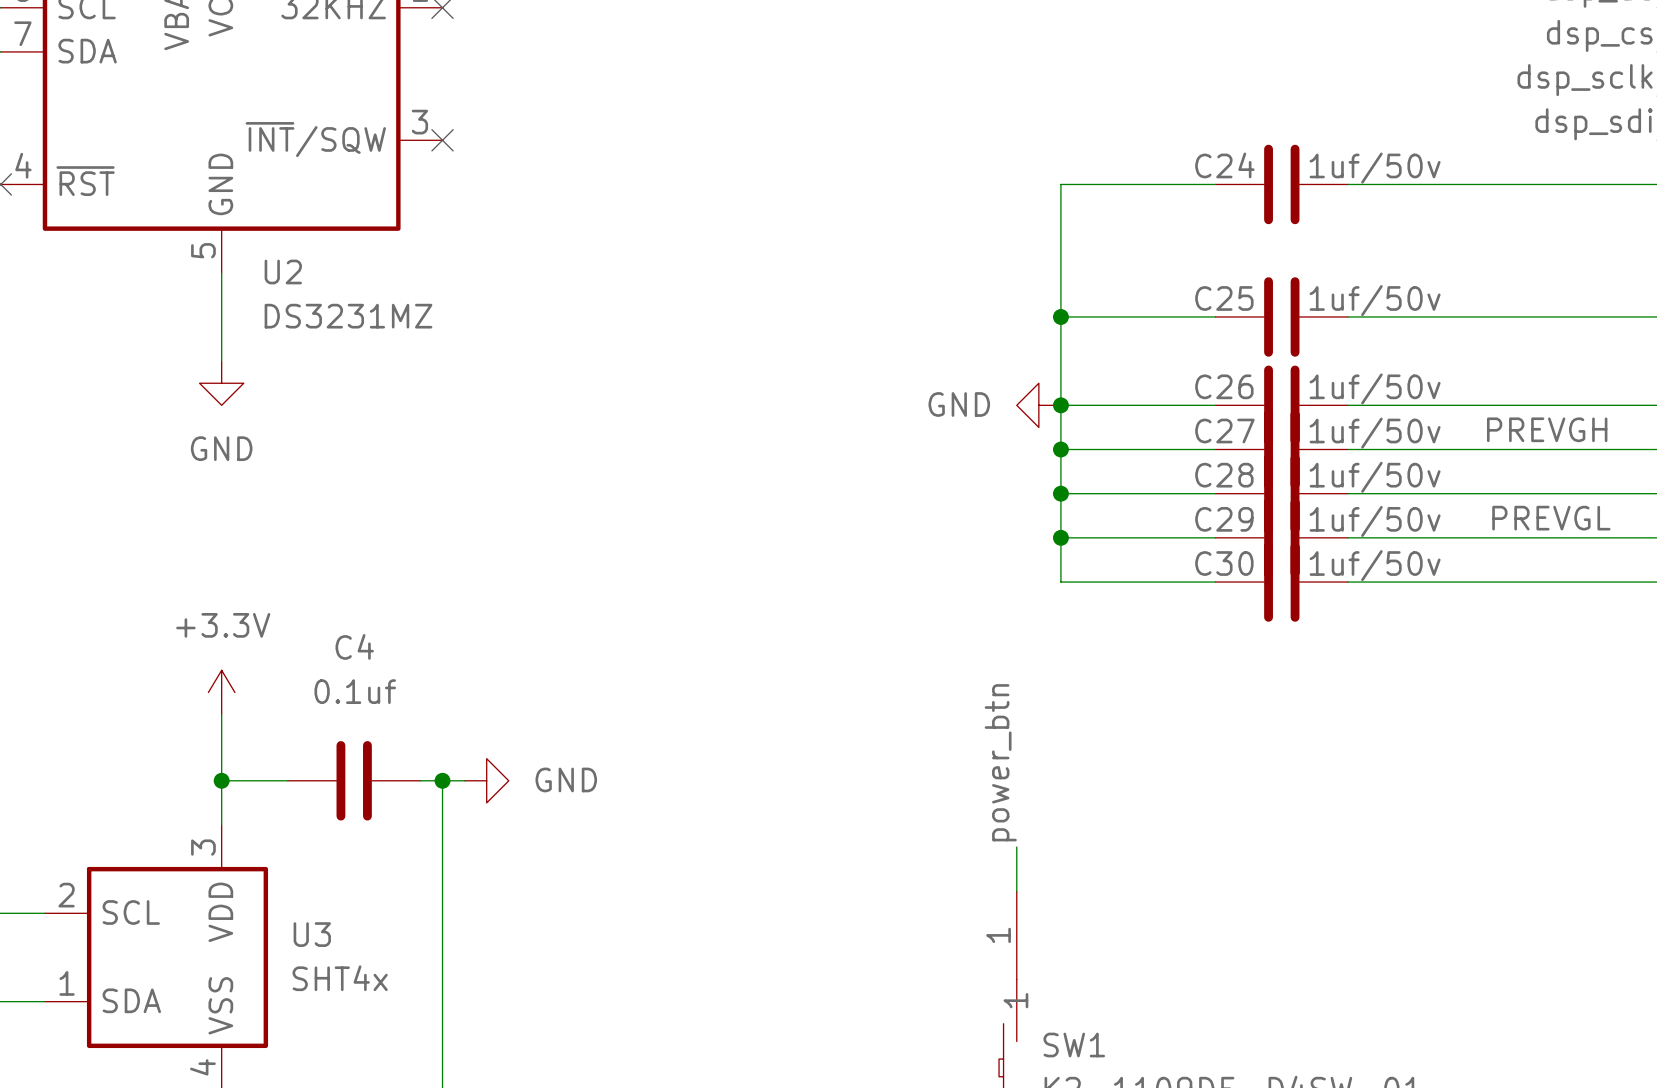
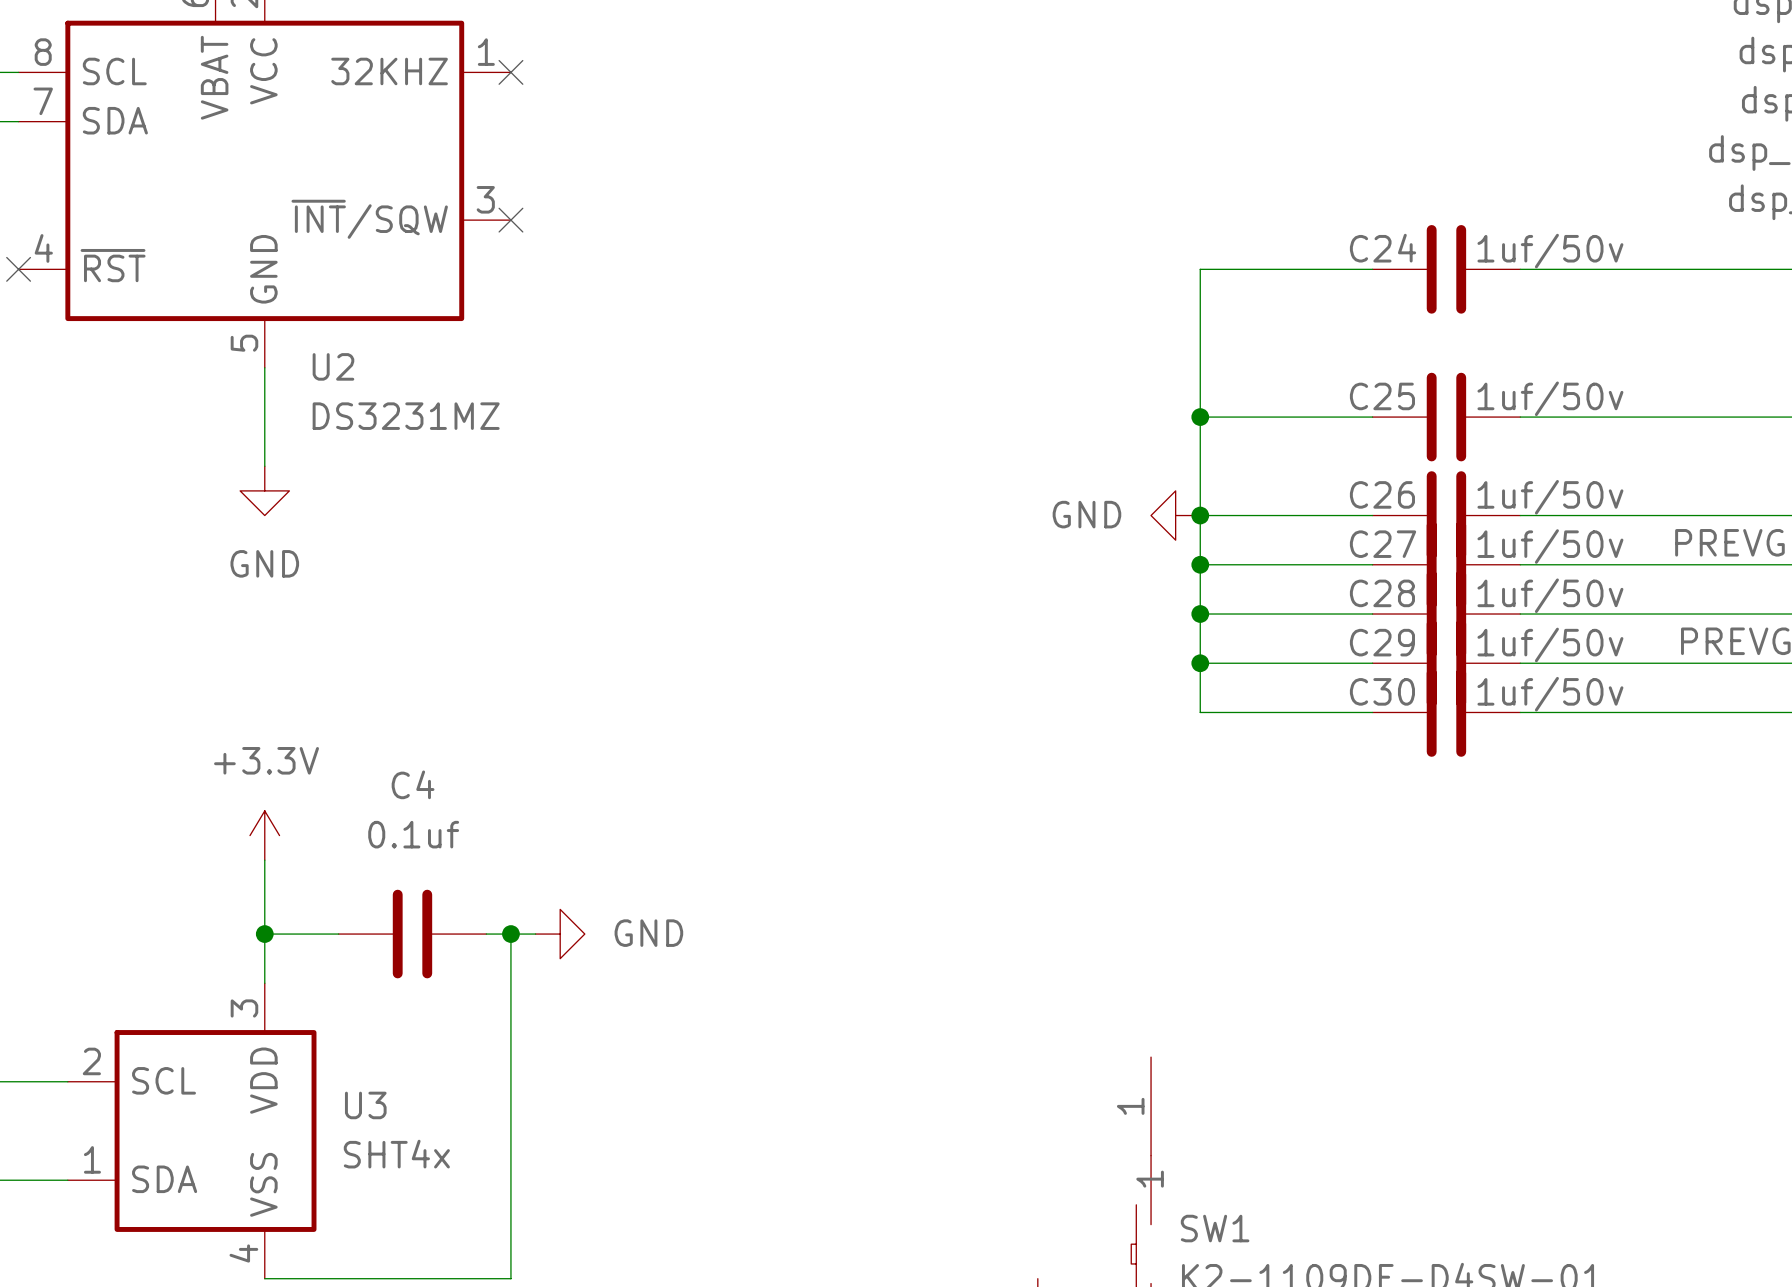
label: power_btn (1000, 762) -> none
wire: (1016, 847) (1016, 891) -> none

